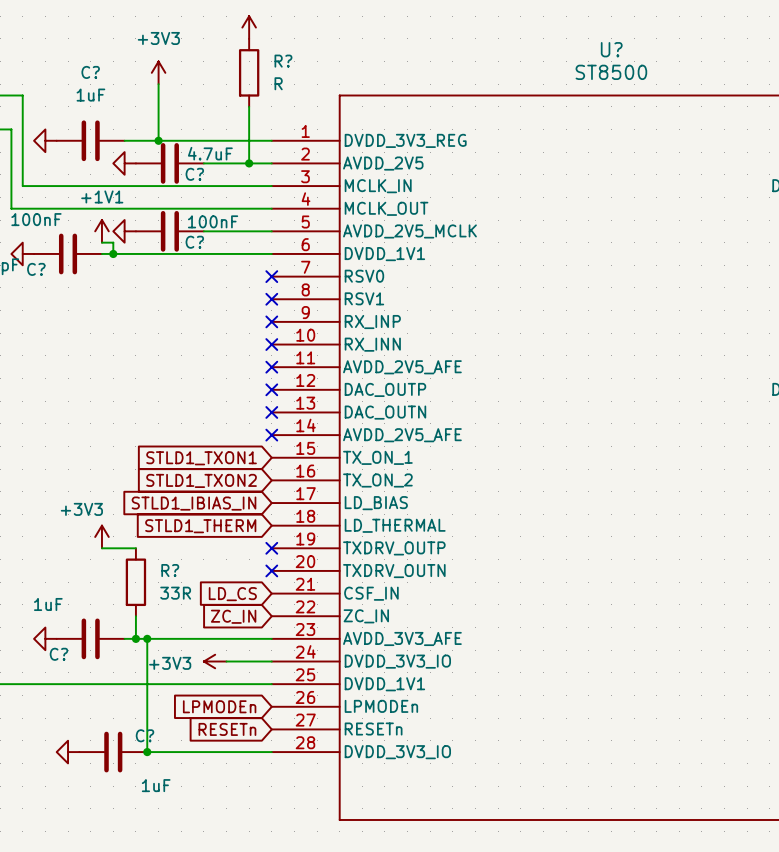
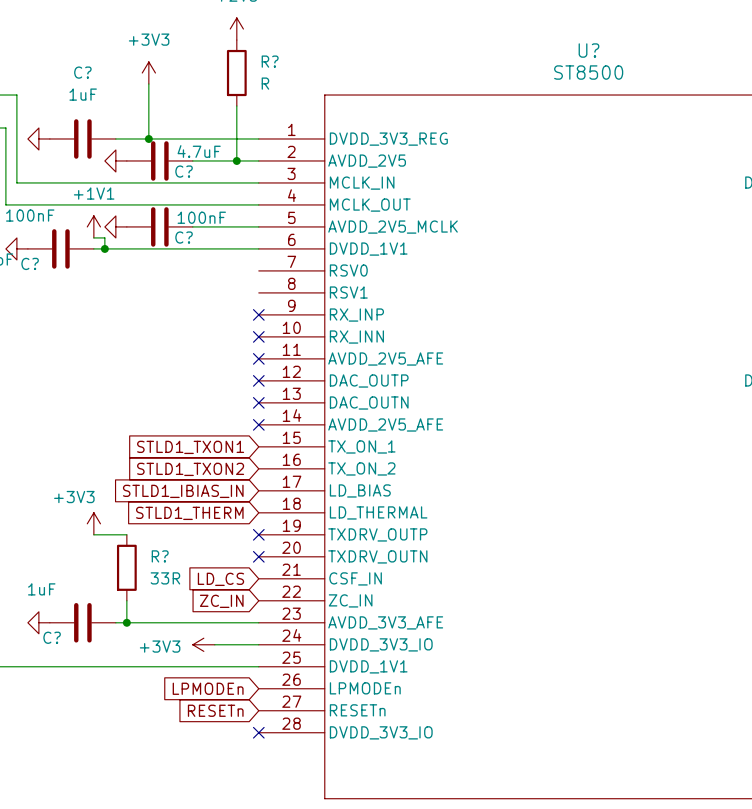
no-connect mark: (271, 276) -> none
no-connect mark: (271, 299) -> none
wire: (147, 638) (147, 752) (271, 752) -> none
junction: (147, 638) -> none
power symbol: (68, 752) -> none
C?: 1uF (113, 752) -> none
junction: (147, 752) -> none
no-connect mark: none -> (258, 732)

